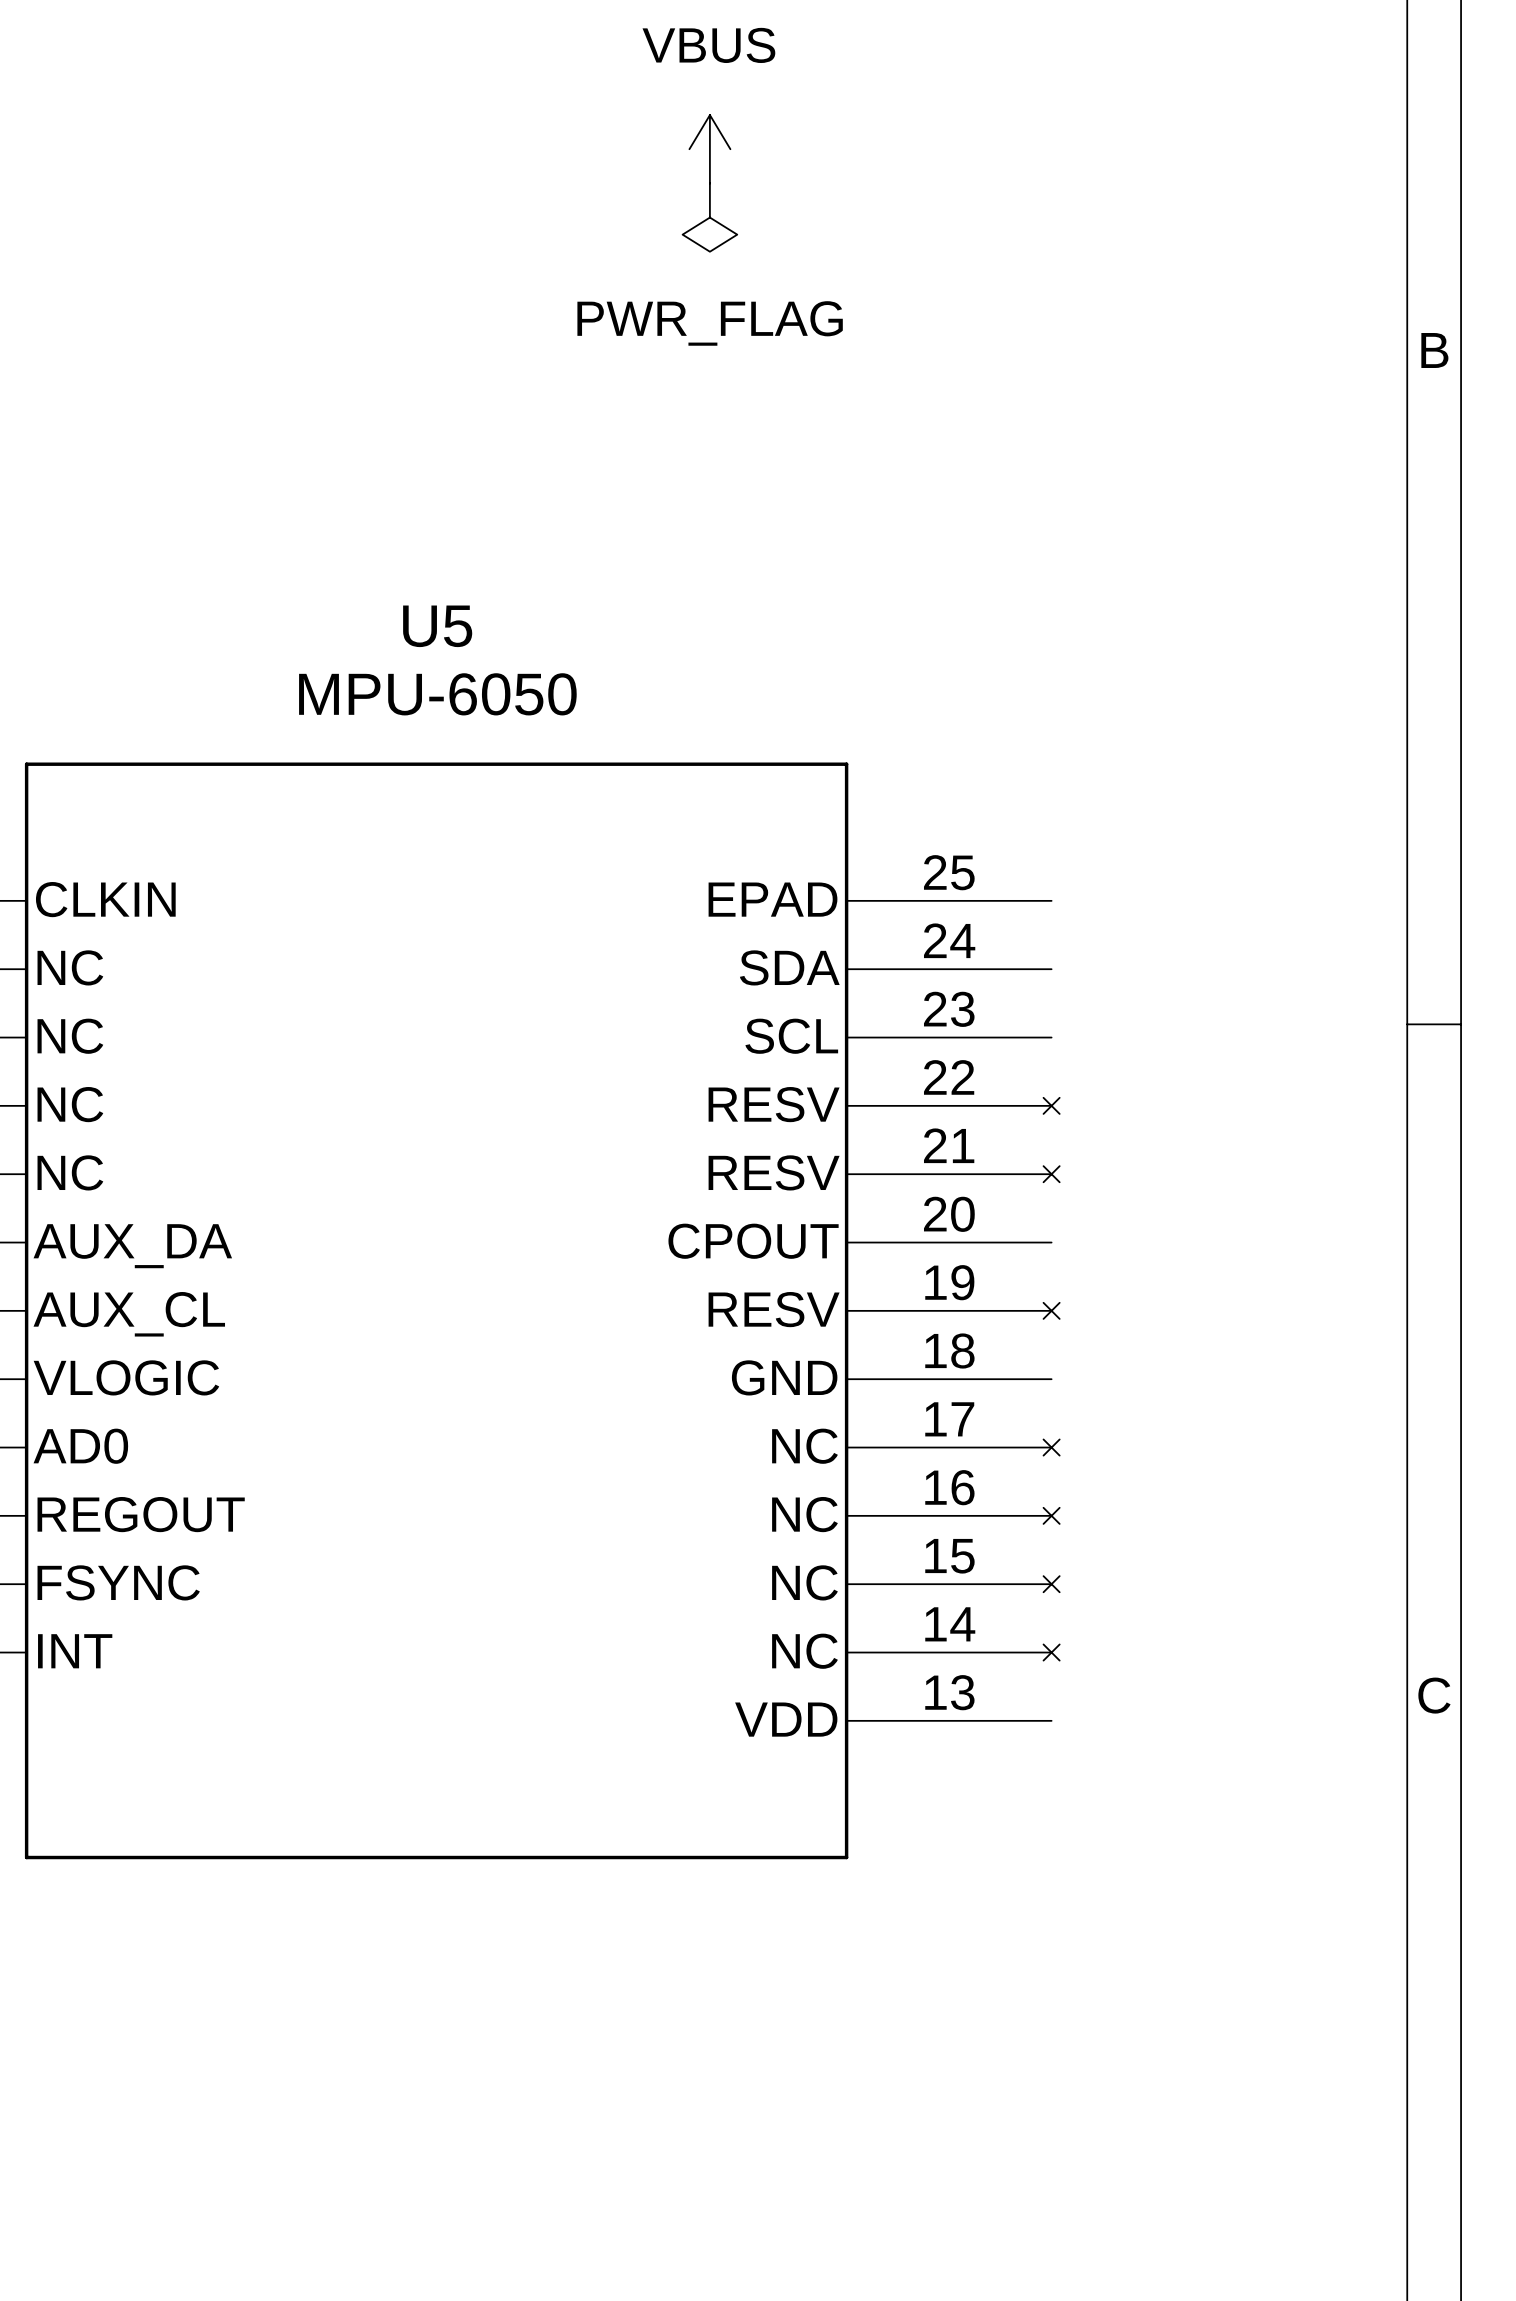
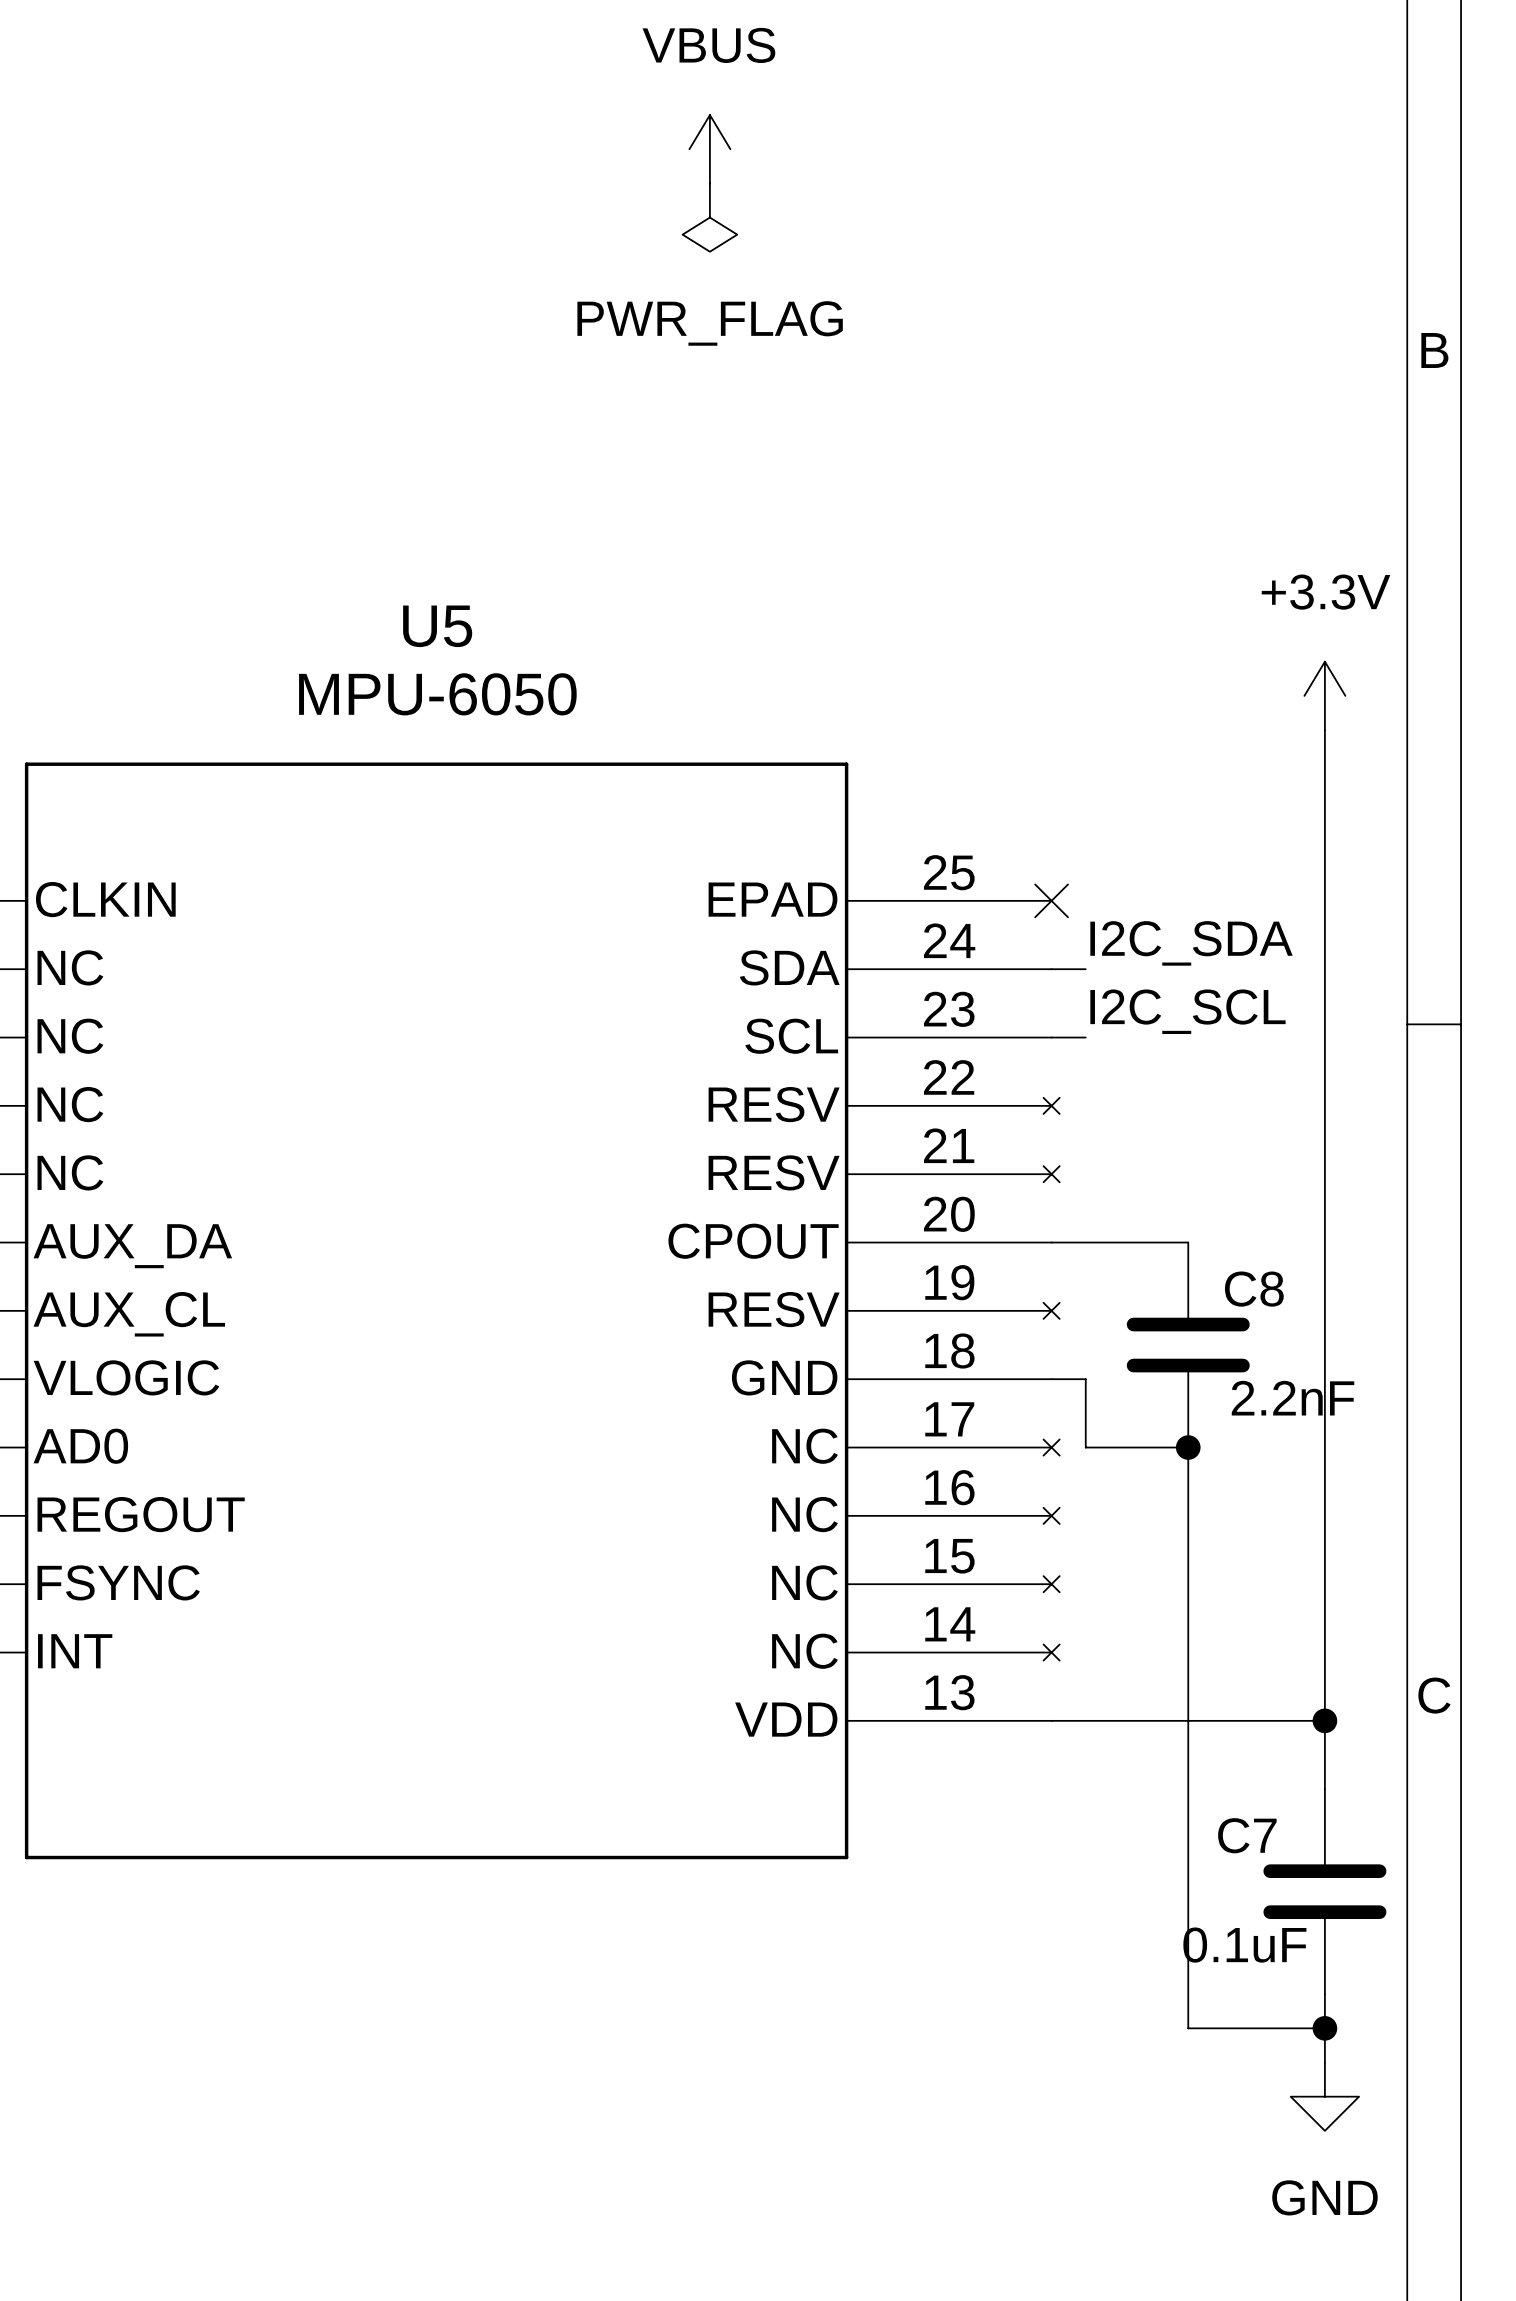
power symbol: none -> +3.3V (1324, 695)
wire: none -> (1324, 730) (1324, 1789)
no-connect mark: none -> (1051, 900)
label: none -> I2C_SDA (1191, 943)
wire: none -> (1051, 969) (1085, 969)
label: none -> I2C_SCL (1187, 1011)
wire: none -> (1051, 1037) (1085, 1037)
wire: none -> (1051, 1242) (1188, 1242)
C8: none -> 2.2nF (1188, 1345)
wire: none -> (1051, 1379) (1085, 1379) (1085, 1447) (1188, 1447) (1188, 2028) (1324, 2028)
junction: none -> (1188, 1447)
wire: none -> (1051, 1720) (1324, 1720)
junction: none -> (1324, 1720)
C7: none -> 0.1uF (1324, 1891)
wire: none -> (1324, 1994) (1324, 2062)
junction: none -> (1324, 2028)
power symbol: none -> GND (1324, 2096)

